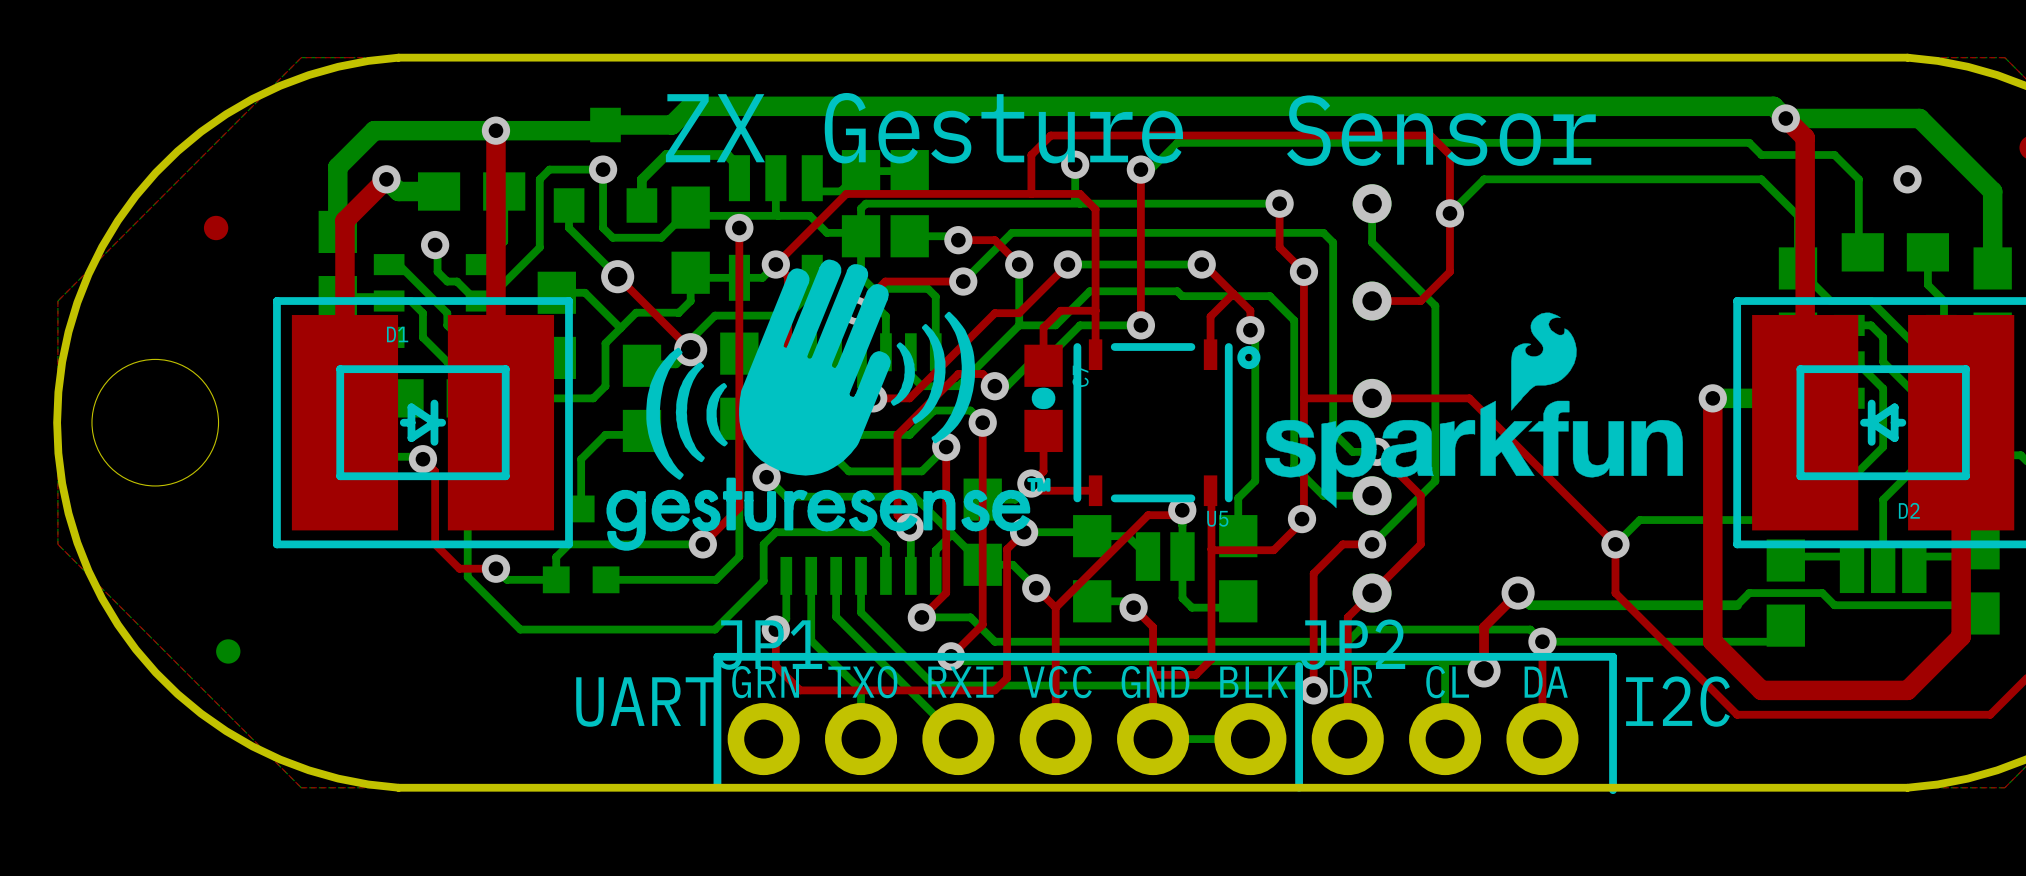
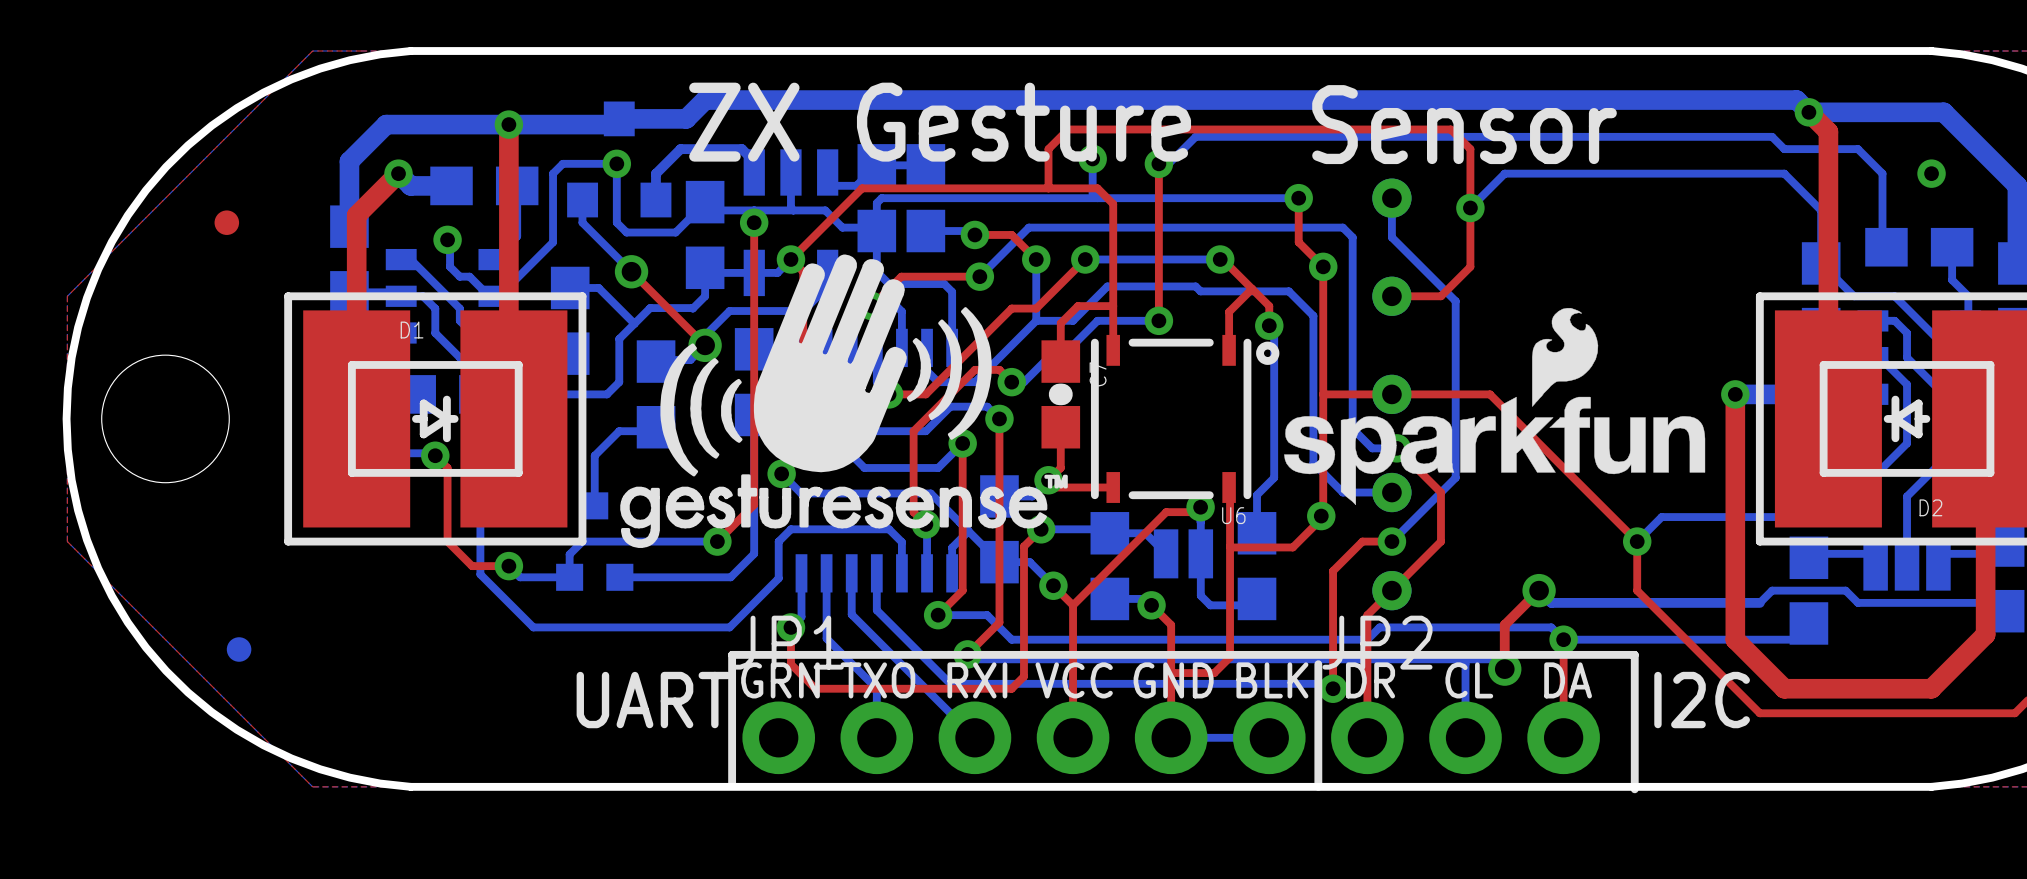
U5 name: U5 (1217, 518) -> U6 (1233, 515)

